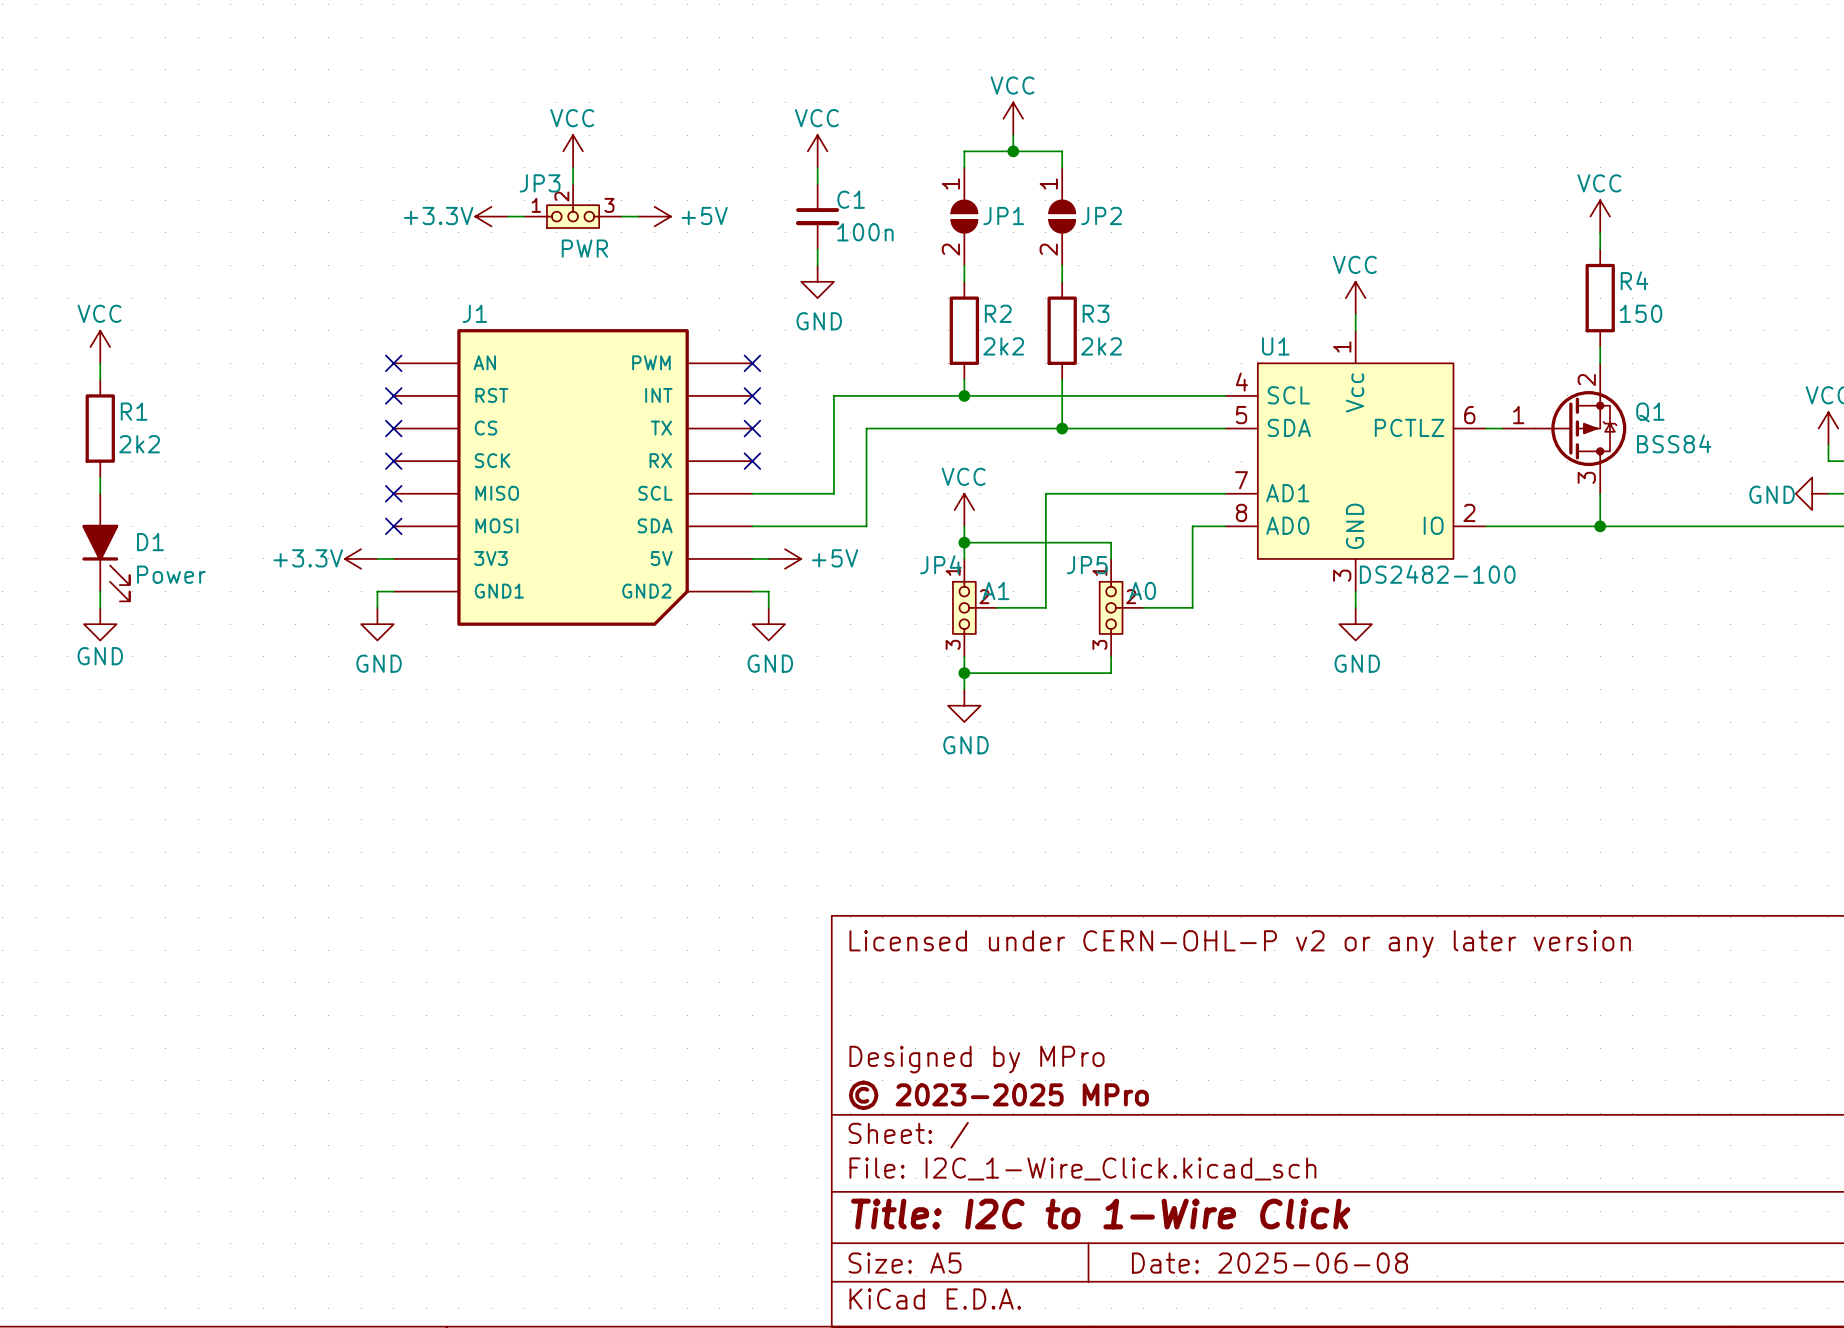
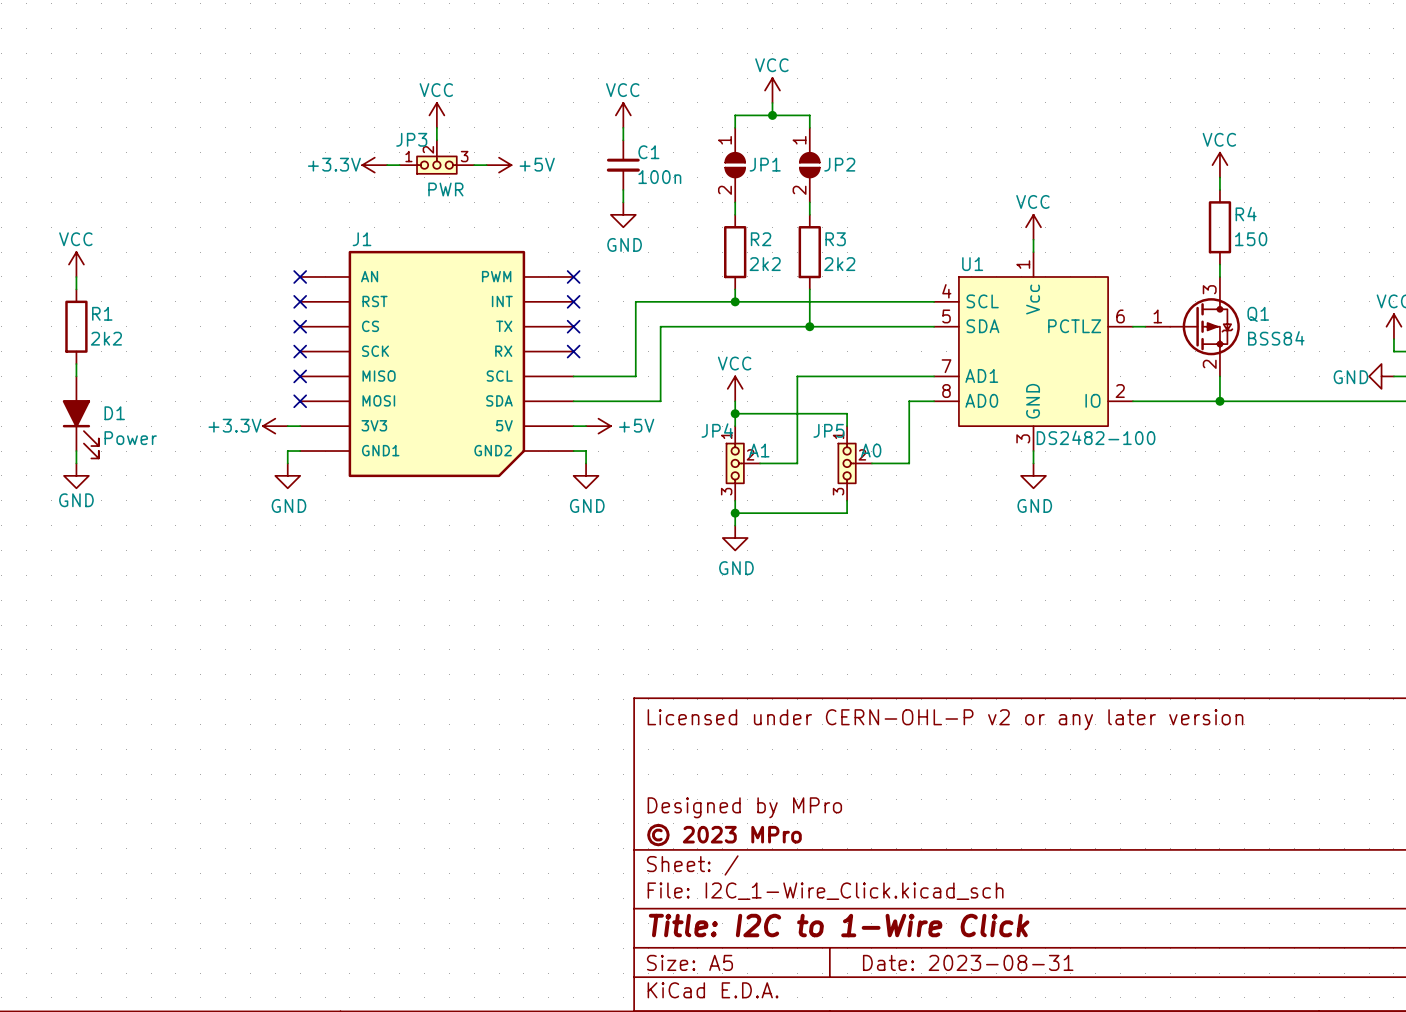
Q1 flip: as is (1580, 428) -> up-down (1205, 326)
title block: © 2023-2025 MPro (998, 1095) -> © 2023 MPro (724, 835)
title block: Date: 2025-06-08 (1269, 1263) -> Date: 2023-08-31 (968, 962)

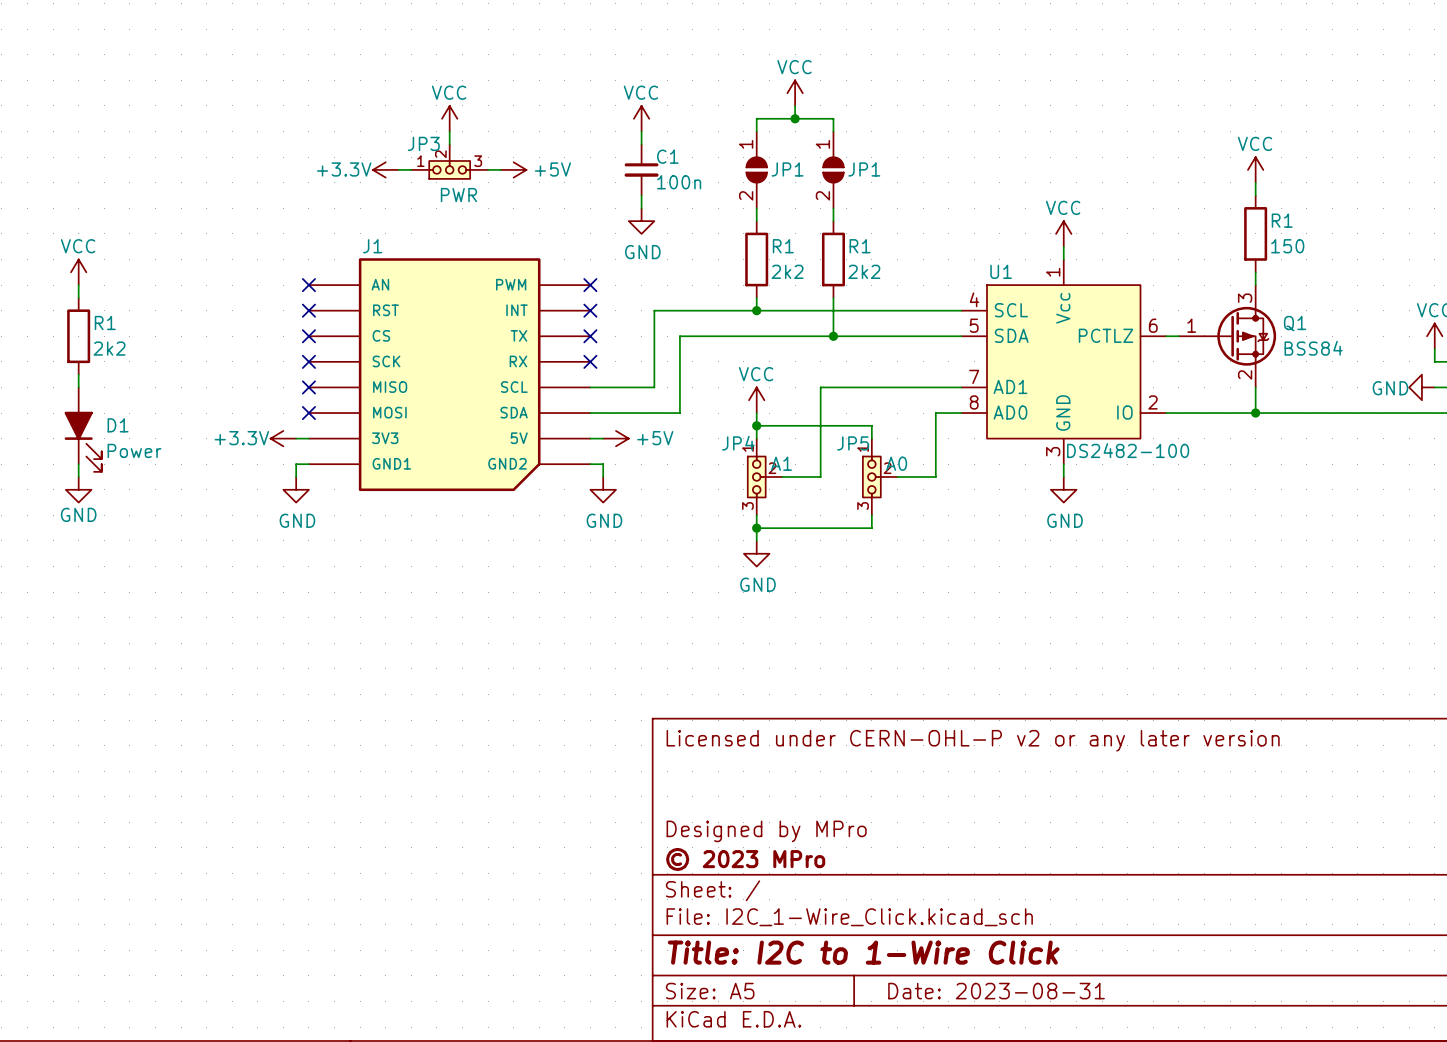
JP2 name: JP2 (839, 164) -> JP1 (864, 169)
R4 name: R4 (1246, 214) -> R1 (1282, 220)
R2 name: R2 (761, 239) -> R1 (783, 246)
R3 name: R3 (835, 239) -> R1 (860, 246)

